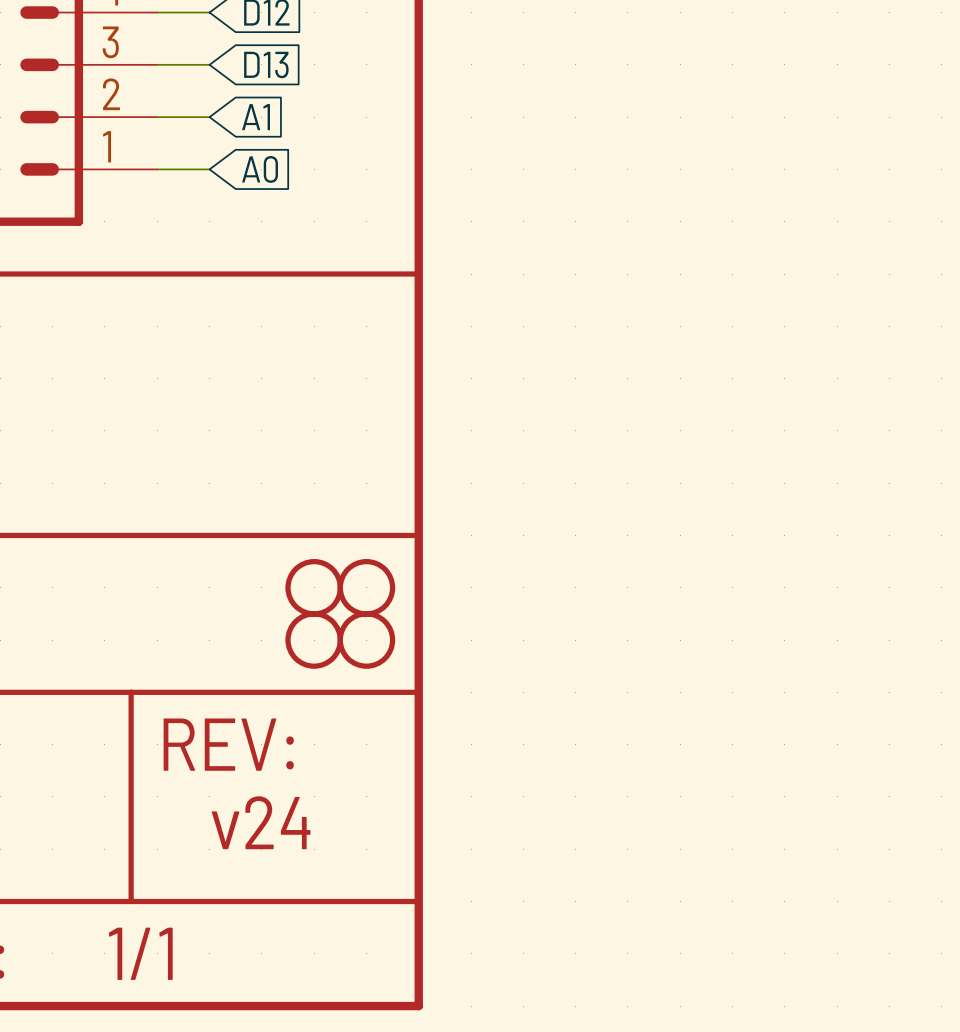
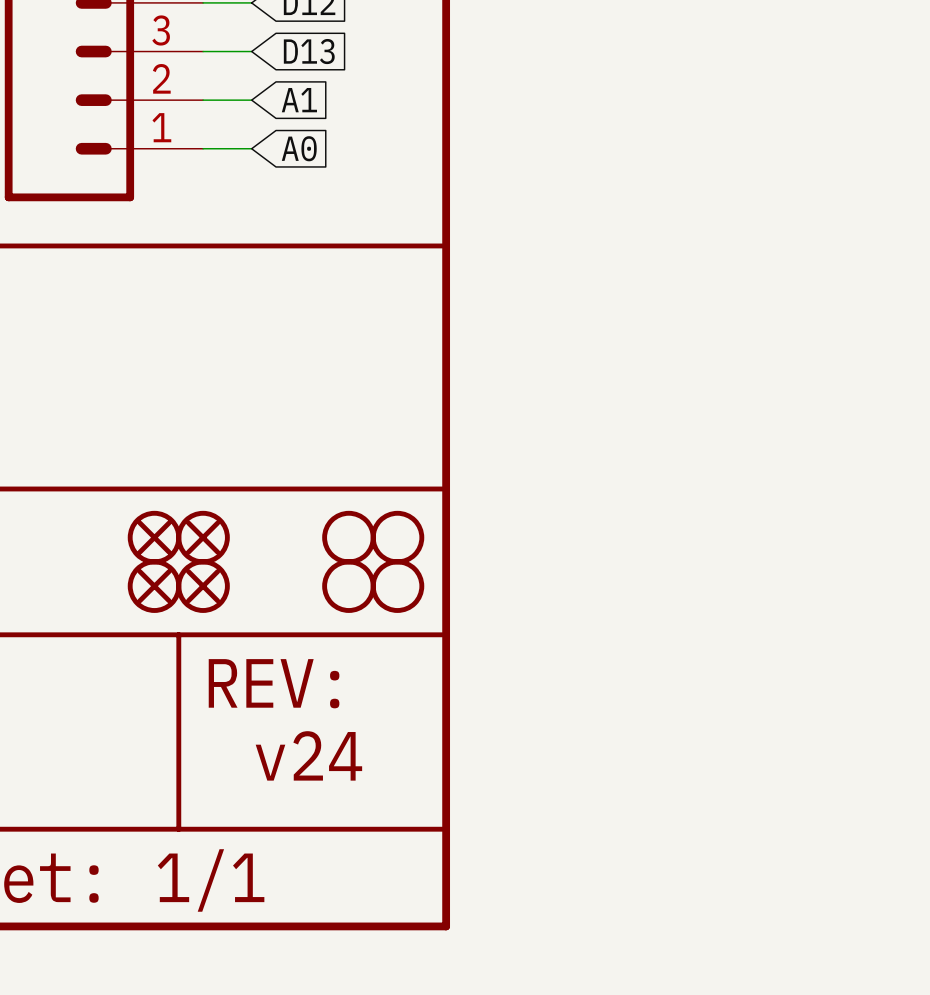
part: none -> (154, 537)
part: none -> (203, 537)
part: none -> (154, 586)
part: none -> (203, 586)

